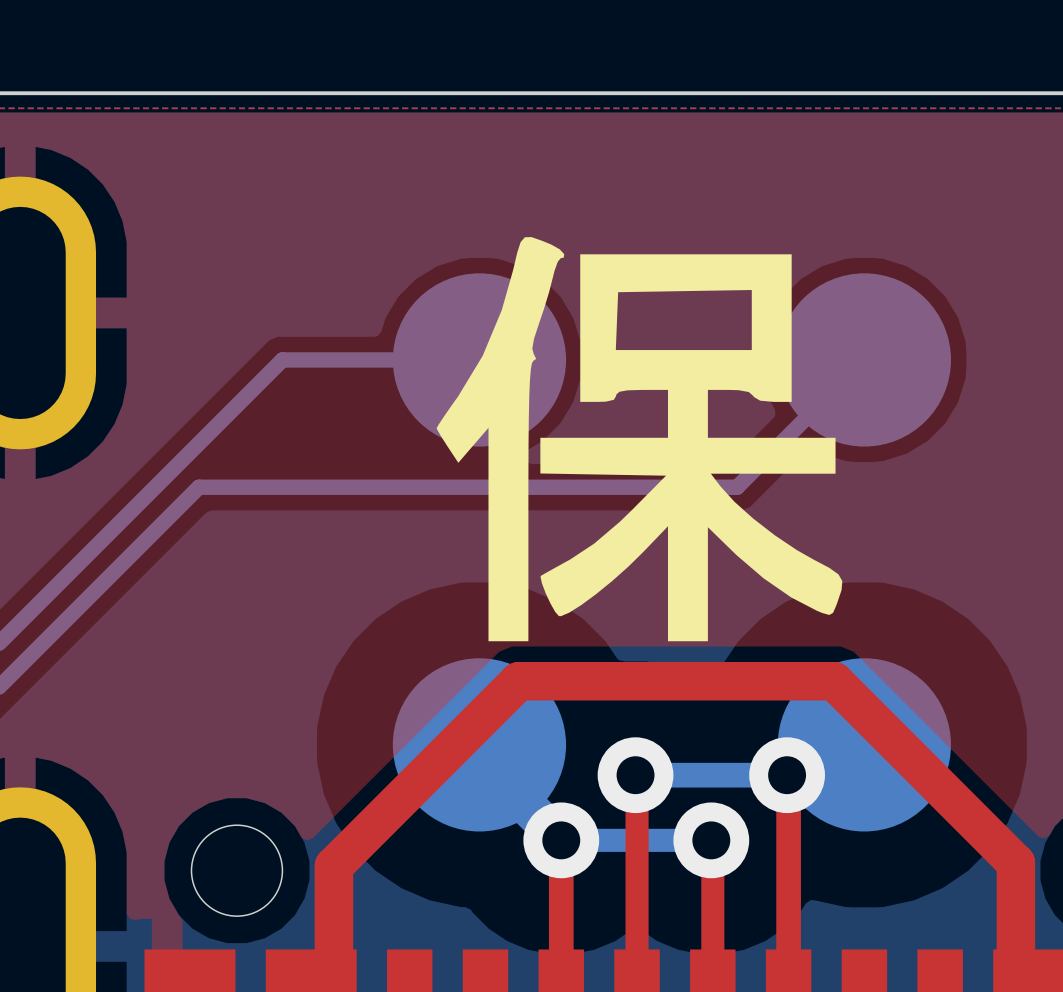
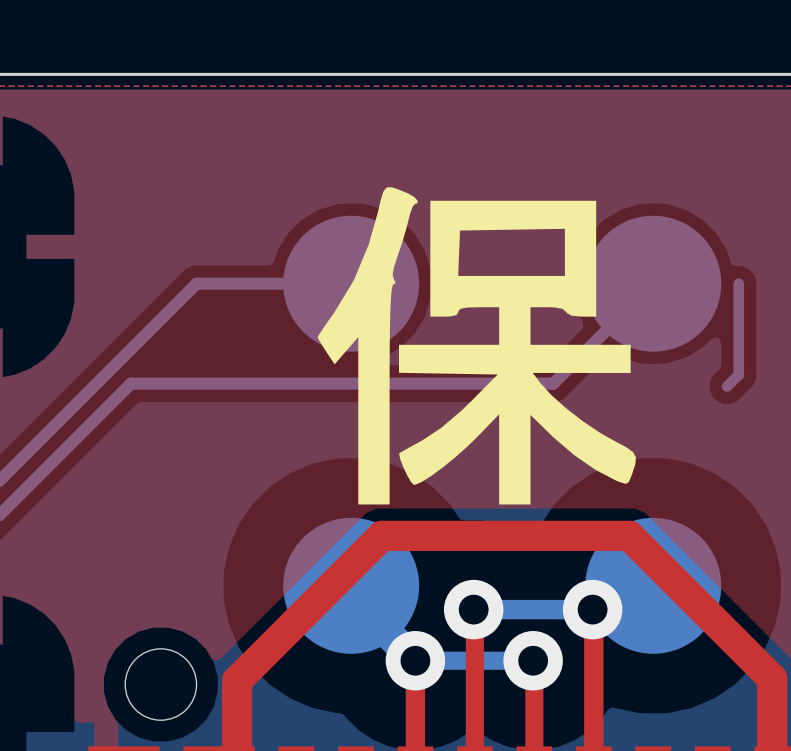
bottom track: none -> (738, 283) (738, 374) (727, 386)

